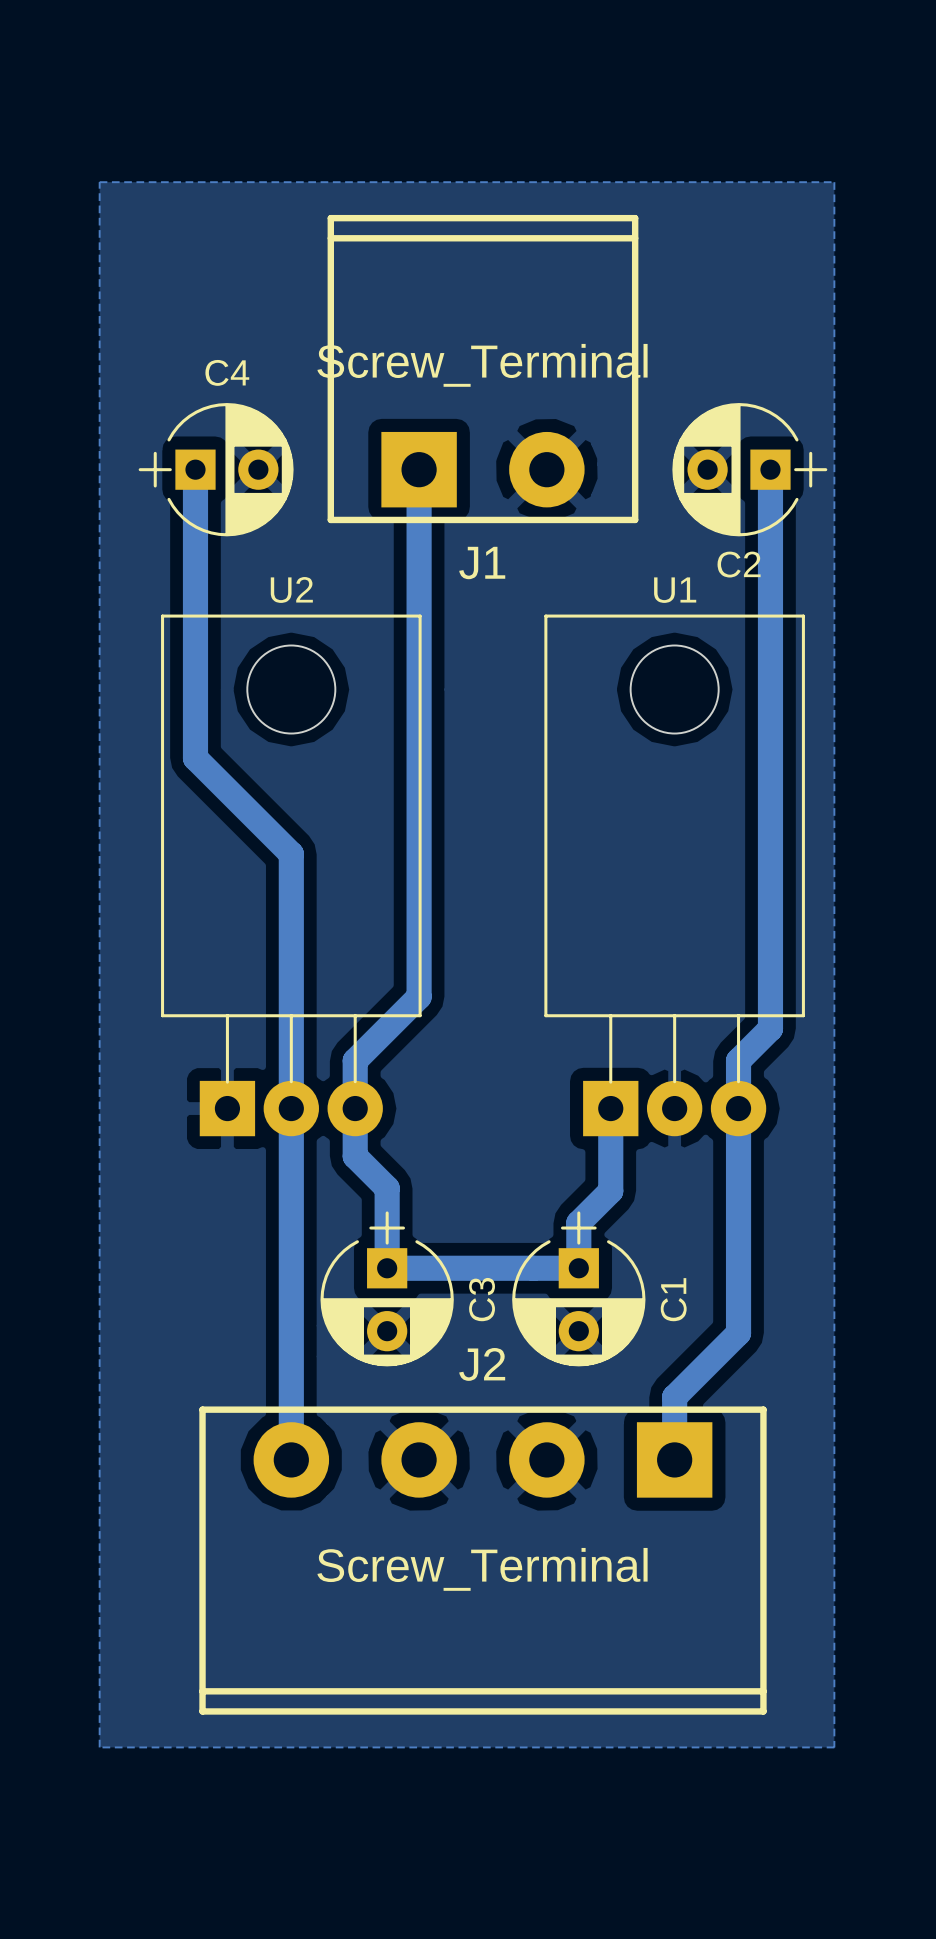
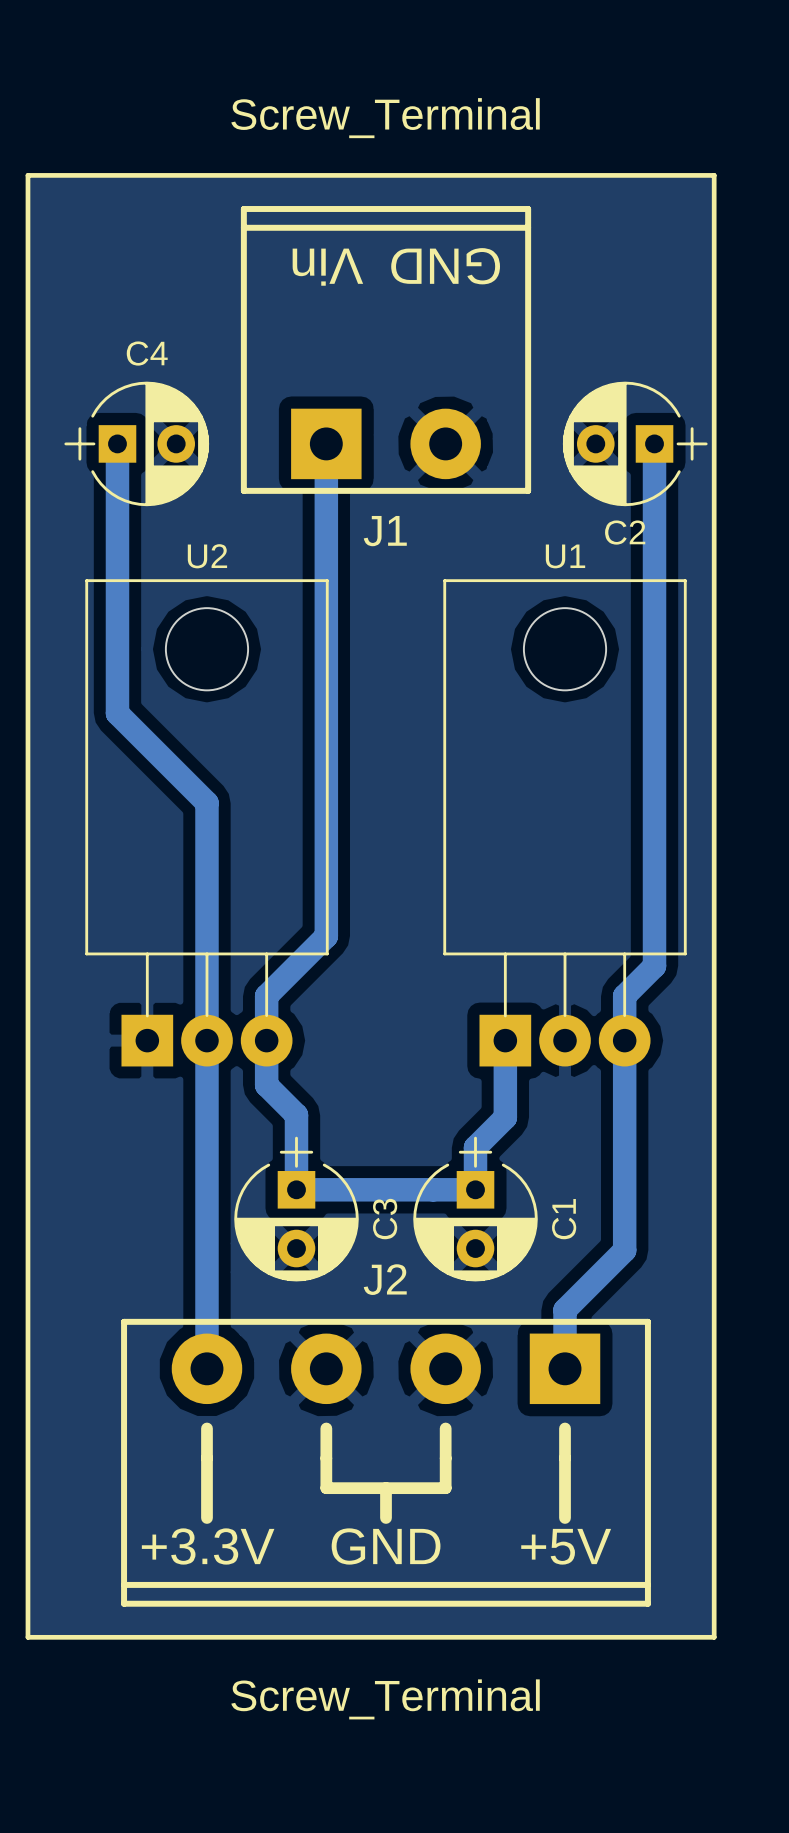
line: none -> (27, 175) (27, 1637) (714, 1637) (714, 175) (27, 175)
text: none -> GND (445, 266)
text: none -> Vin (327, 267)
J1 value position: Screw_Terminal (482, 365) -> Screw_Terminal (385, 118)
line: none -> (206, 1428) (206, 1517)
line: none -> (326, 1428) (326, 1488) (445, 1488) (445, 1428)
line: none -> (565, 1428) (565, 1517)
J2 value position: Screw_Terminal (482, 1569) -> Screw_Terminal (385, 1699)
line: none -> (386, 1488) (386, 1517)
text: none -> +3.3V (208, 1546)
text: none -> GND (386, 1546)
text: none -> +5V (566, 1546)

